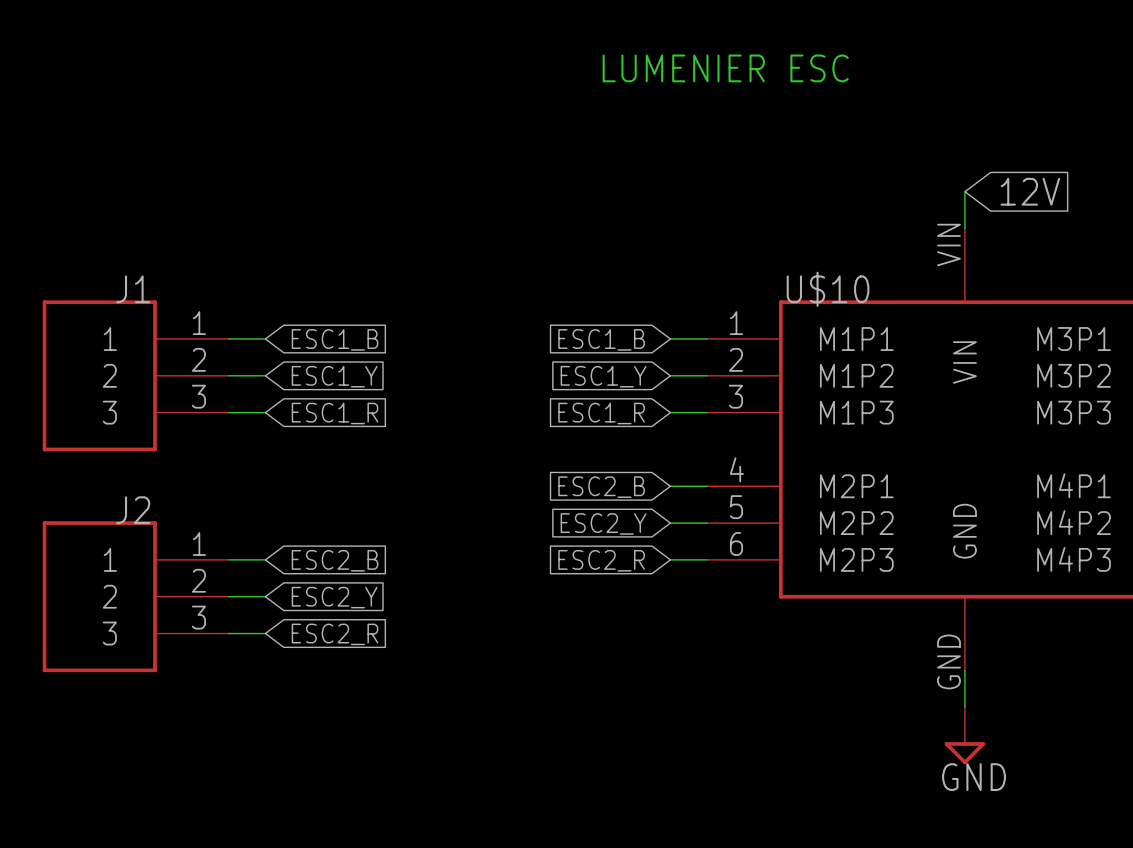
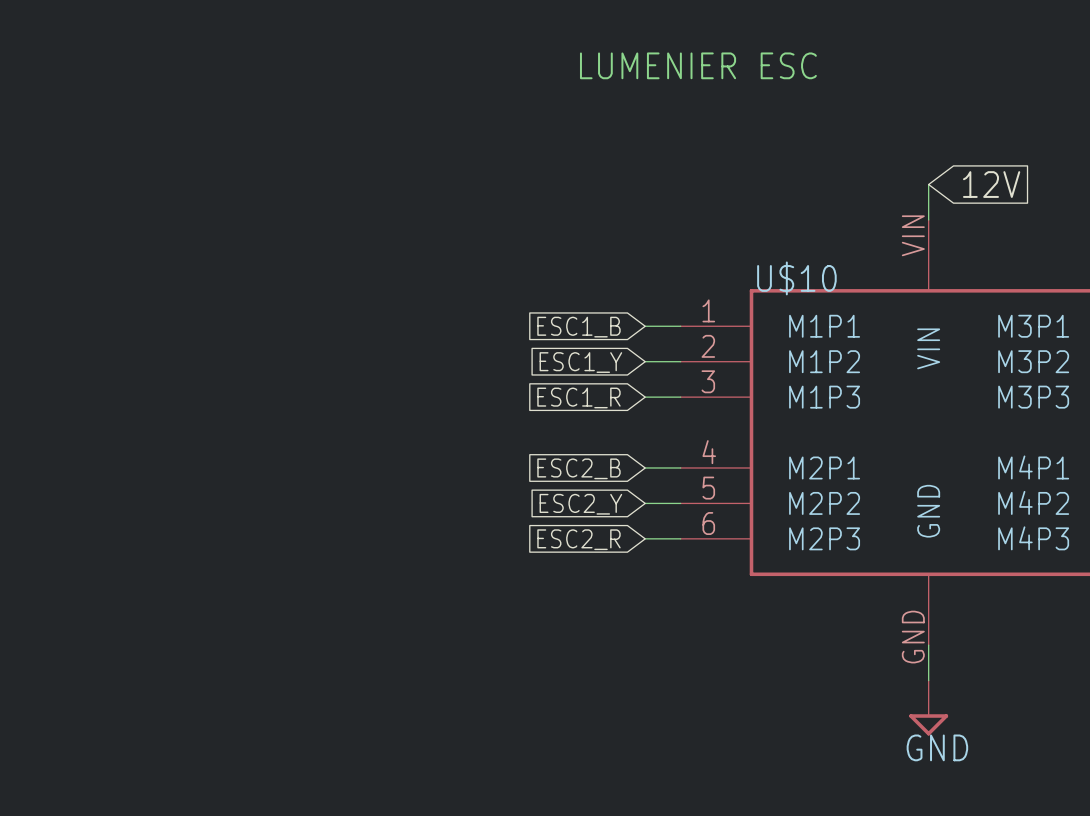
wire: (228, 339) (265, 339) -> none
global label: ESC1_B (335, 339) -> none
J1: (135, 375) -> none
wire: (228, 375) (265, 375) -> none
global label: ESC1_Y (334, 376) -> none
wire: (228, 412) (265, 412) -> none
global label: ESC1_R (335, 413) -> none
wire: (228, 559) (265, 559) -> none
global label: ESC2_B (335, 560) -> none
J2: (135, 596) -> none
wire: (228, 596) (265, 596) -> none
global label: ESC2_Y (334, 597) -> none
wire: (228, 633) (265, 633) -> none
global label: ESC2_R (335, 634) -> none

